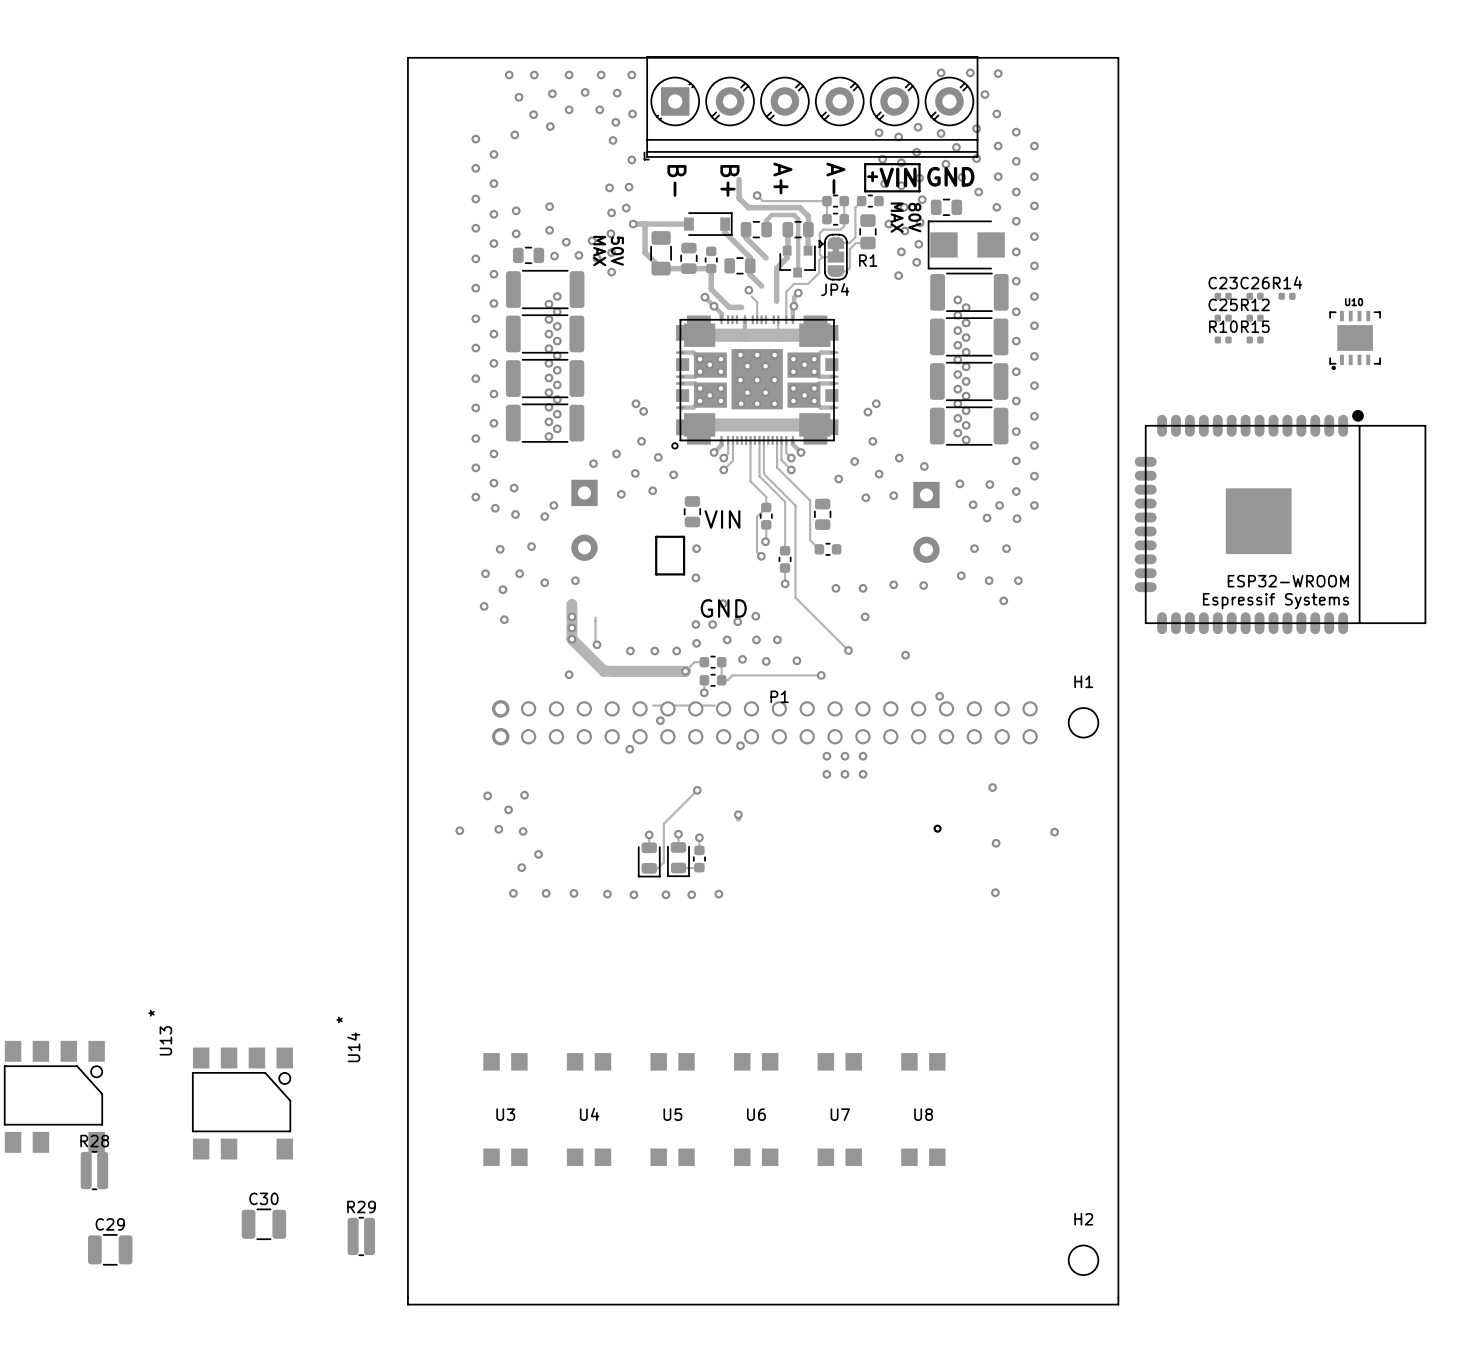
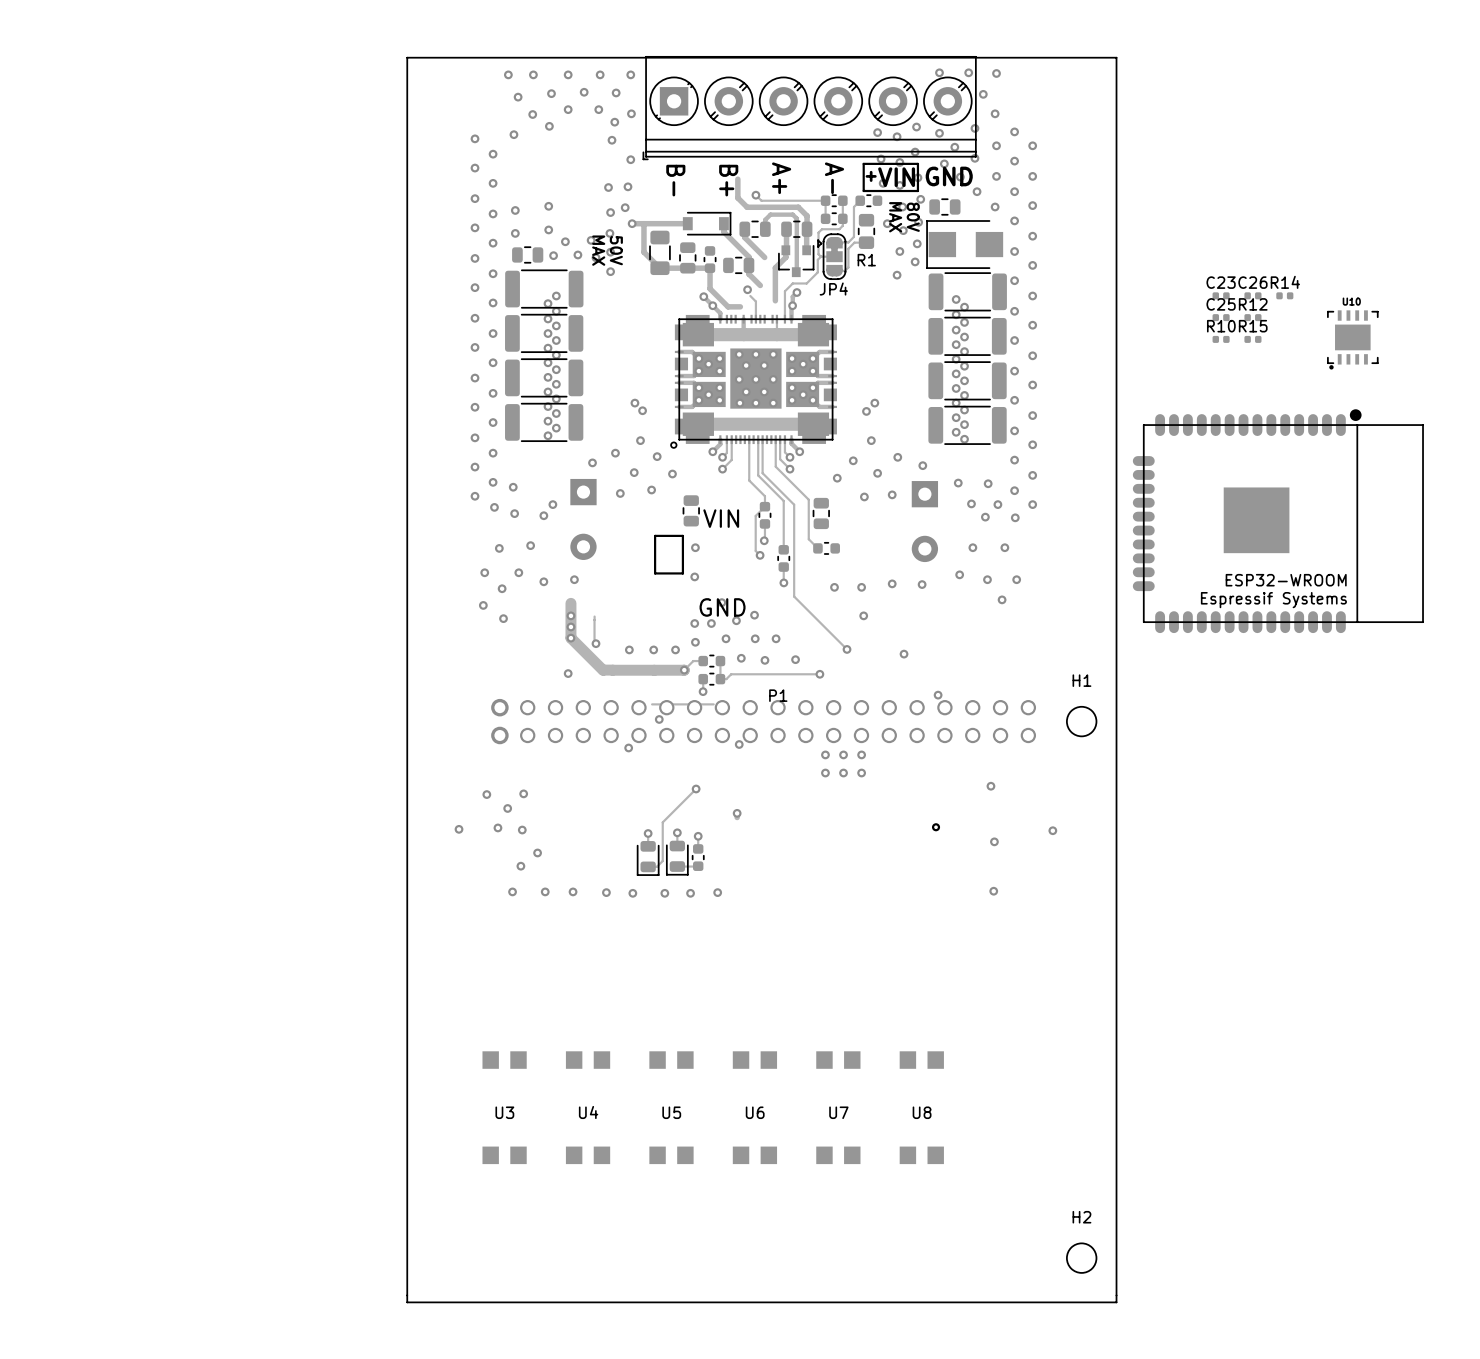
U13: (54, 1096) -> none
U14: (242, 1103) -> none
R28: (94, 1170) -> none
C30: (263, 1224) -> none
R29: (361, 1236) -> none
C29: (110, 1249) -> none

